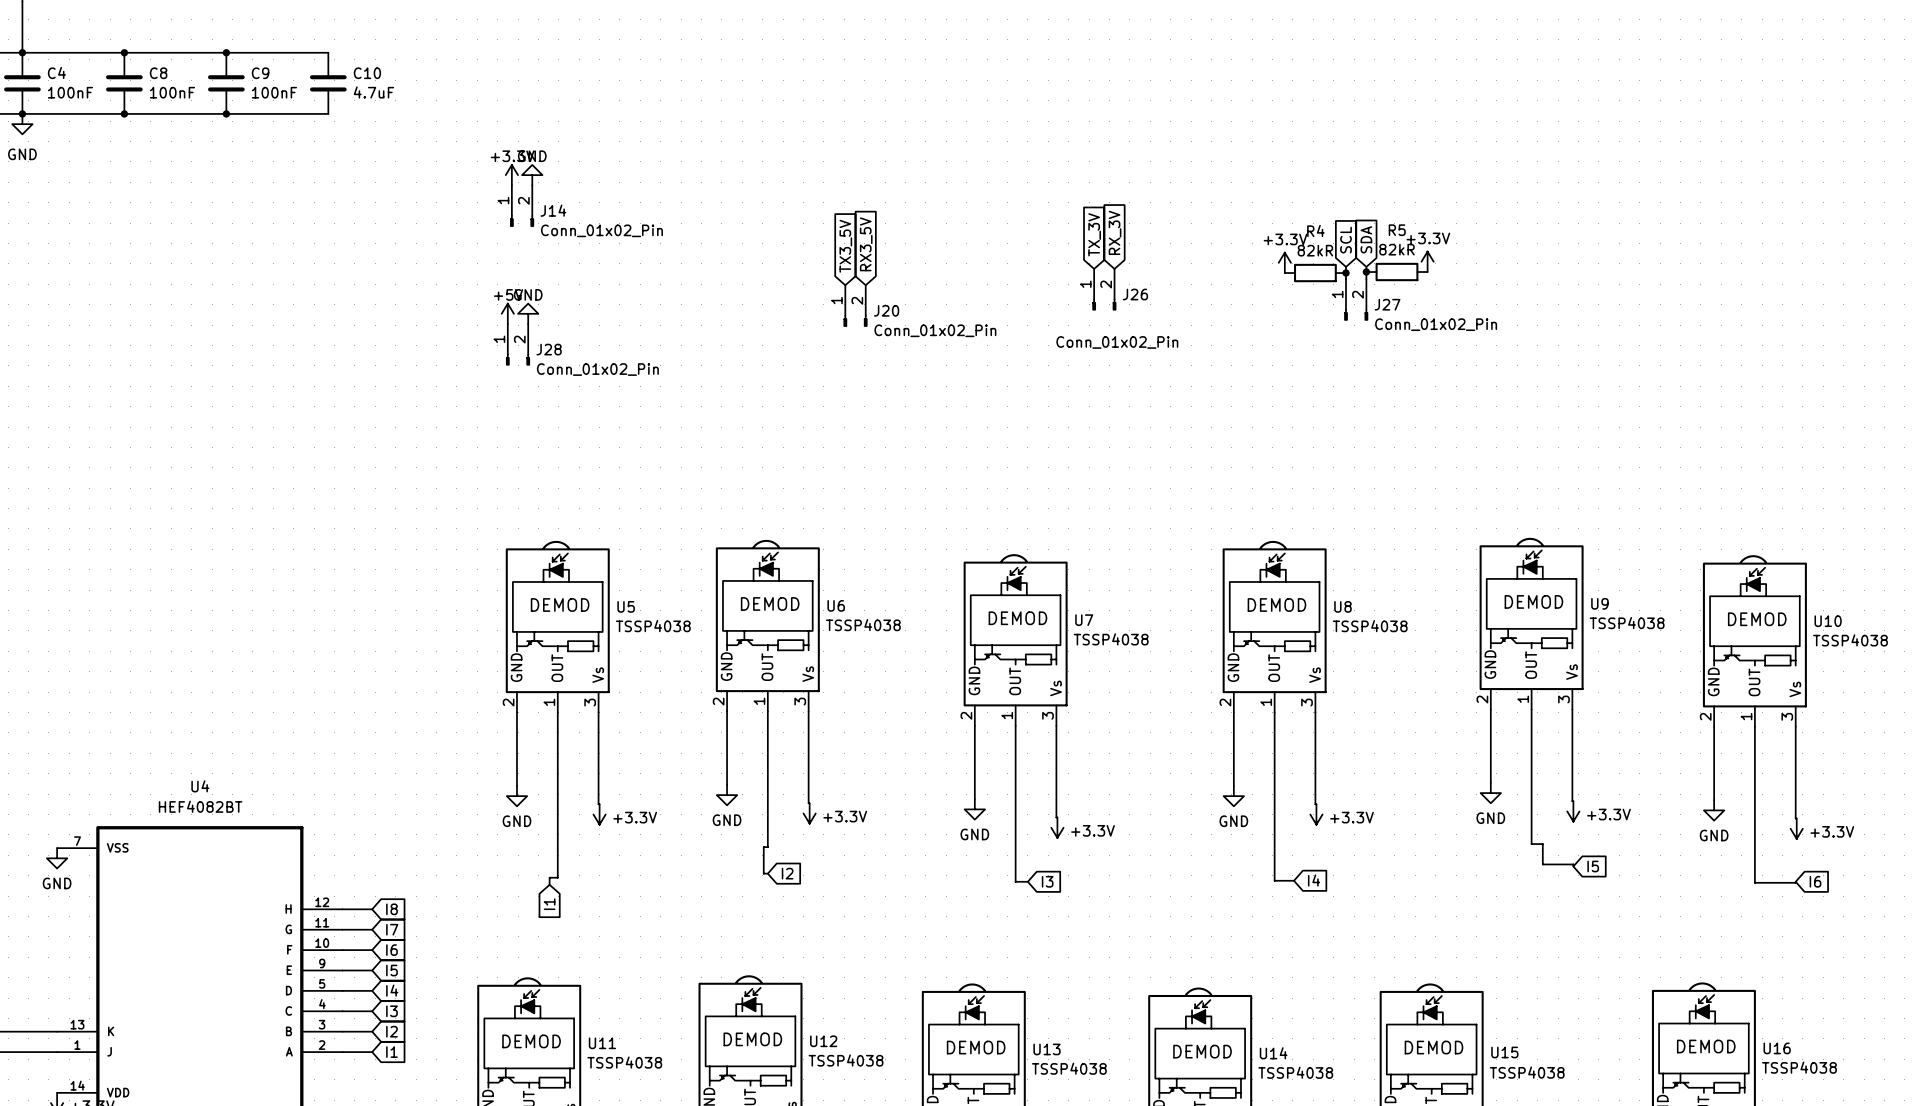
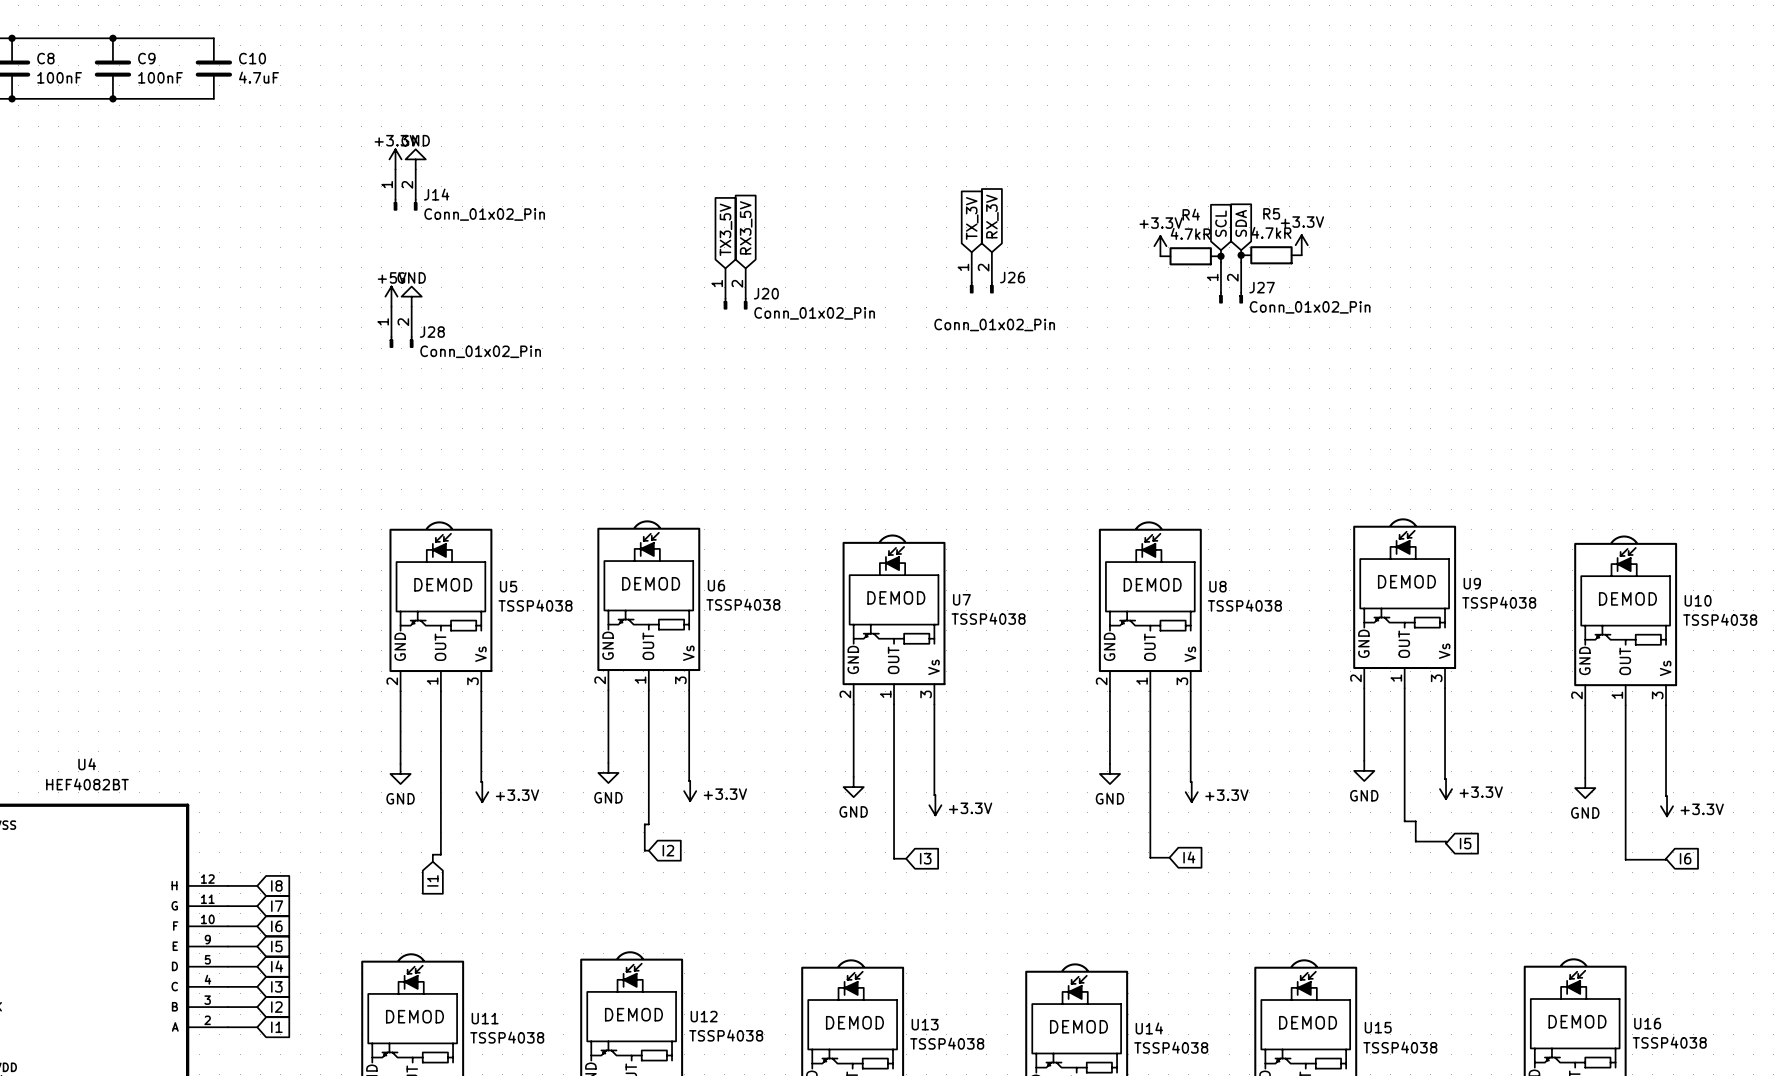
R5 value: 82kR (1396, 249) -> 4.7kR (1271, 232)
R4 value: 82kR (1315, 250) -> 4.7kR (1190, 233)

